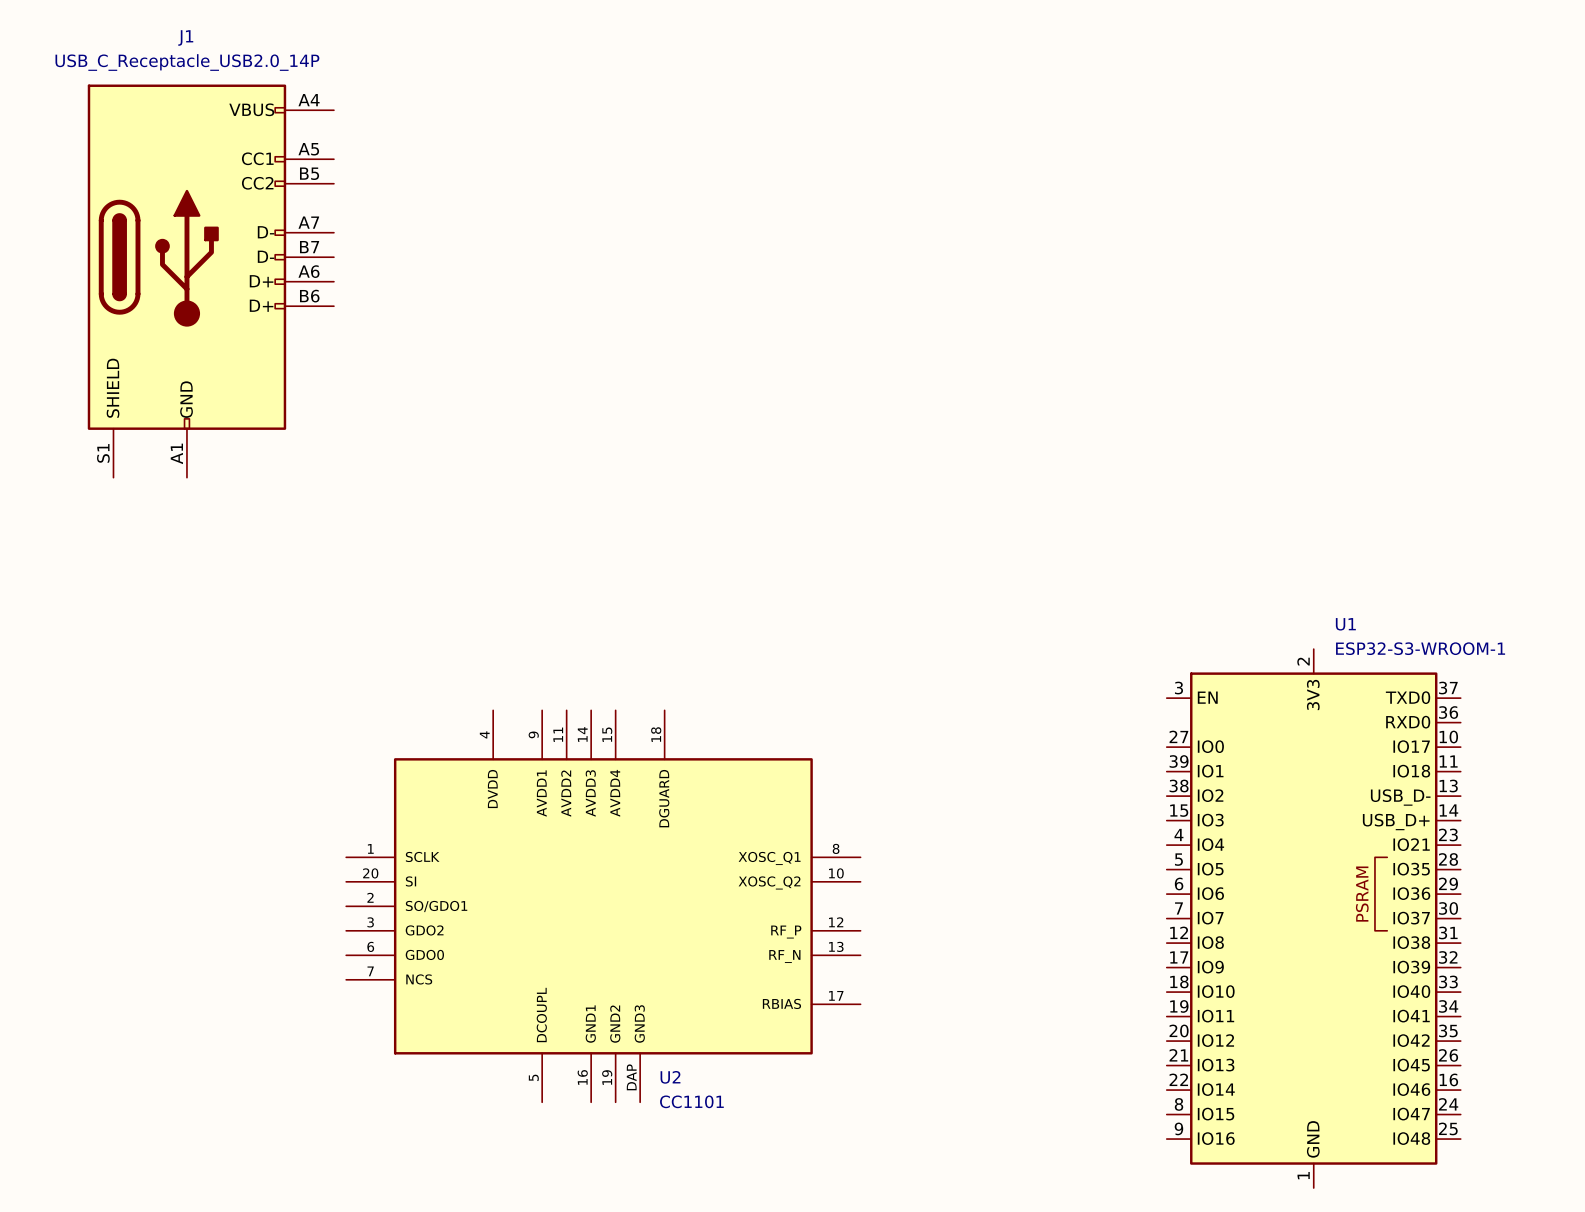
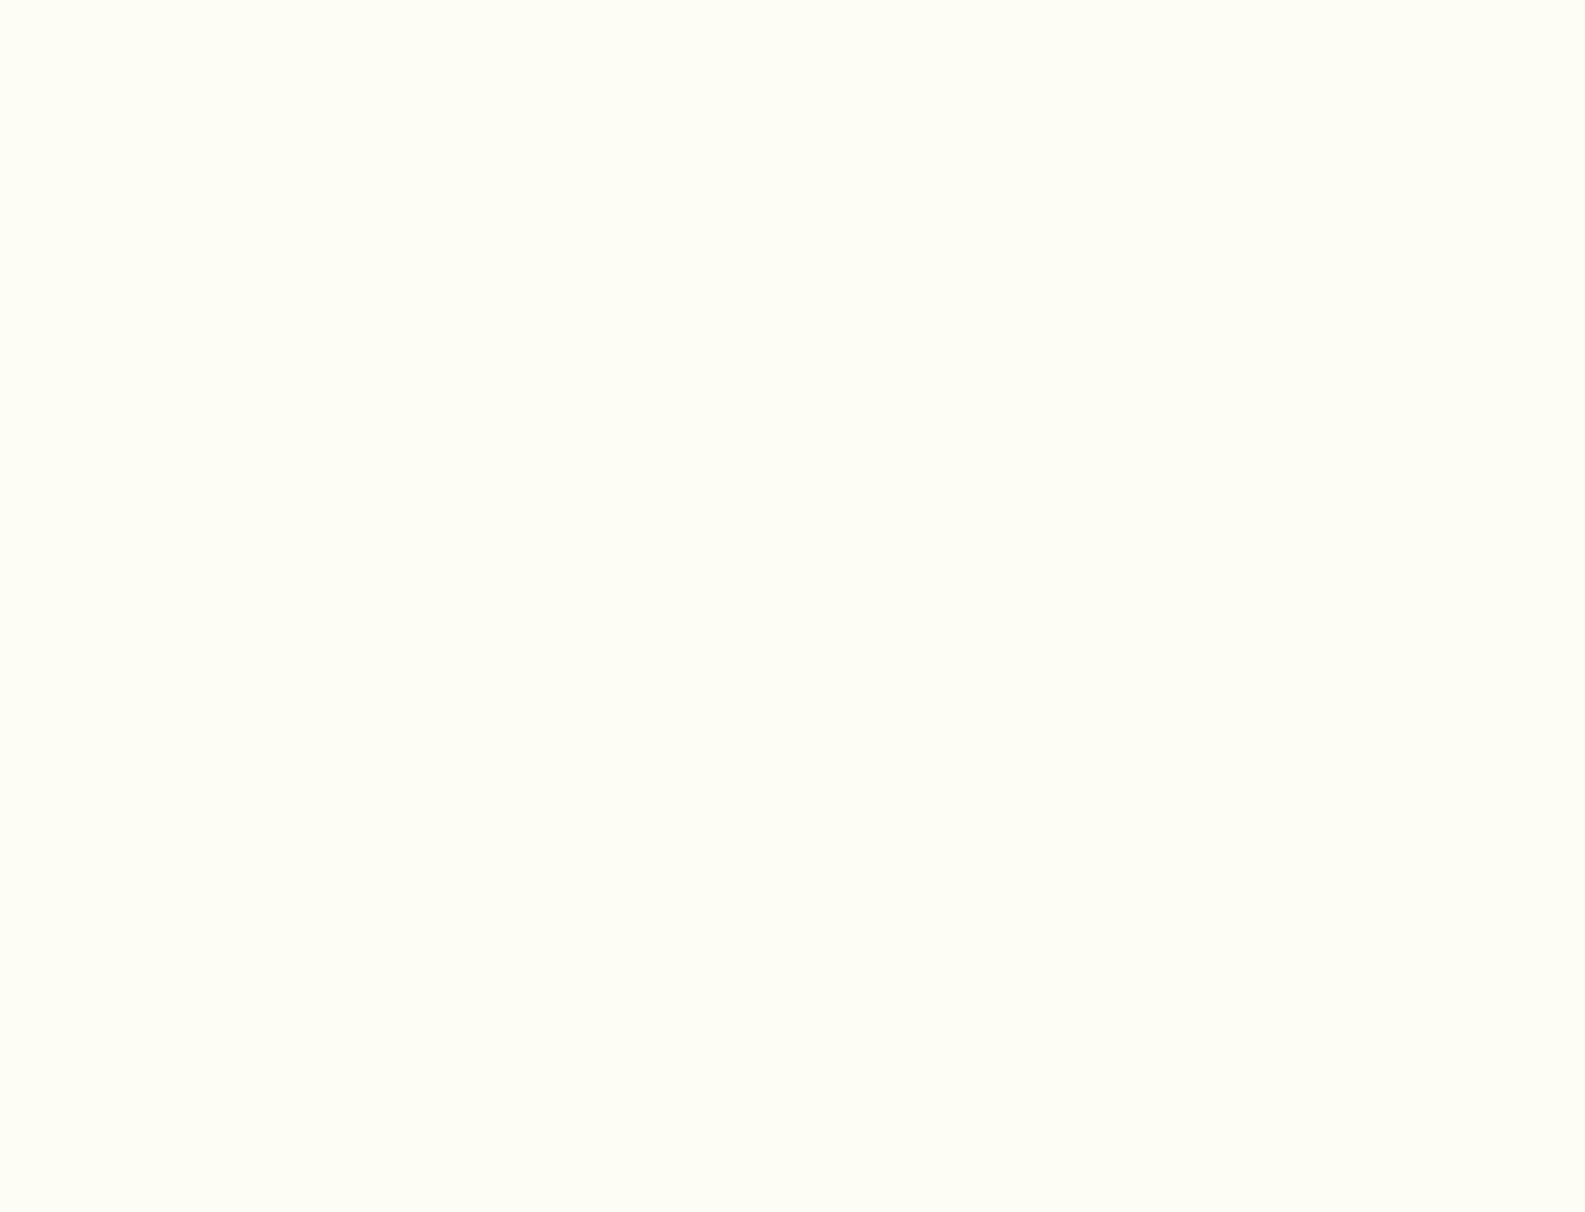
J1: USB_C_Receptacle_USB2.0_14P (210, 281) -> none
U2: CC1101 (603, 906) -> none
U1: ESP32-S3-WROOM-1 (1313, 918) -> none

